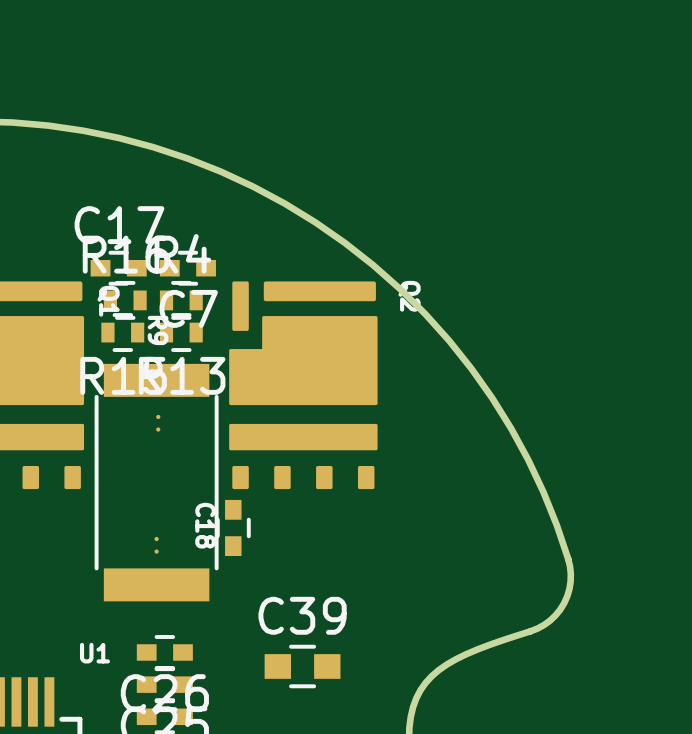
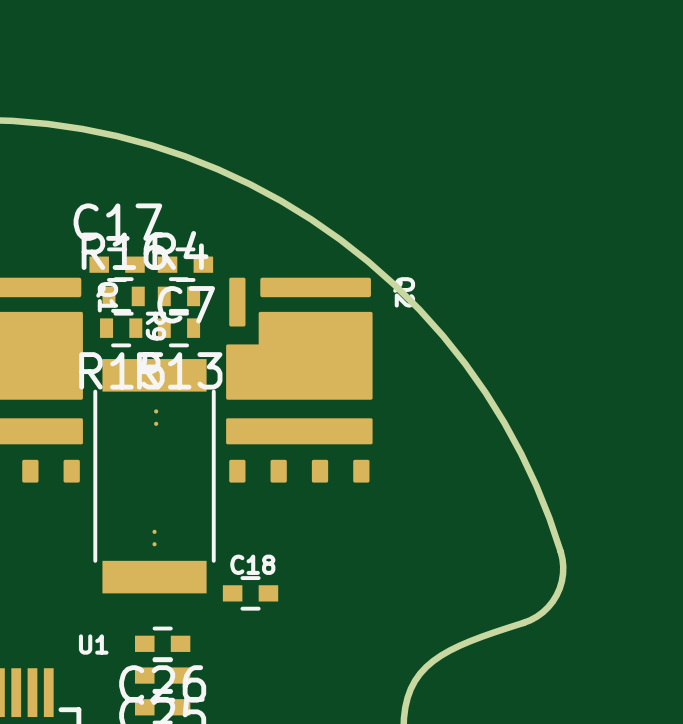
C18 rotation: 0° (233, 527) -> 90° clockwise (250, 593)
C18 position: (233, 527) -> (250, 593)
C39: (302, 666) -> none

